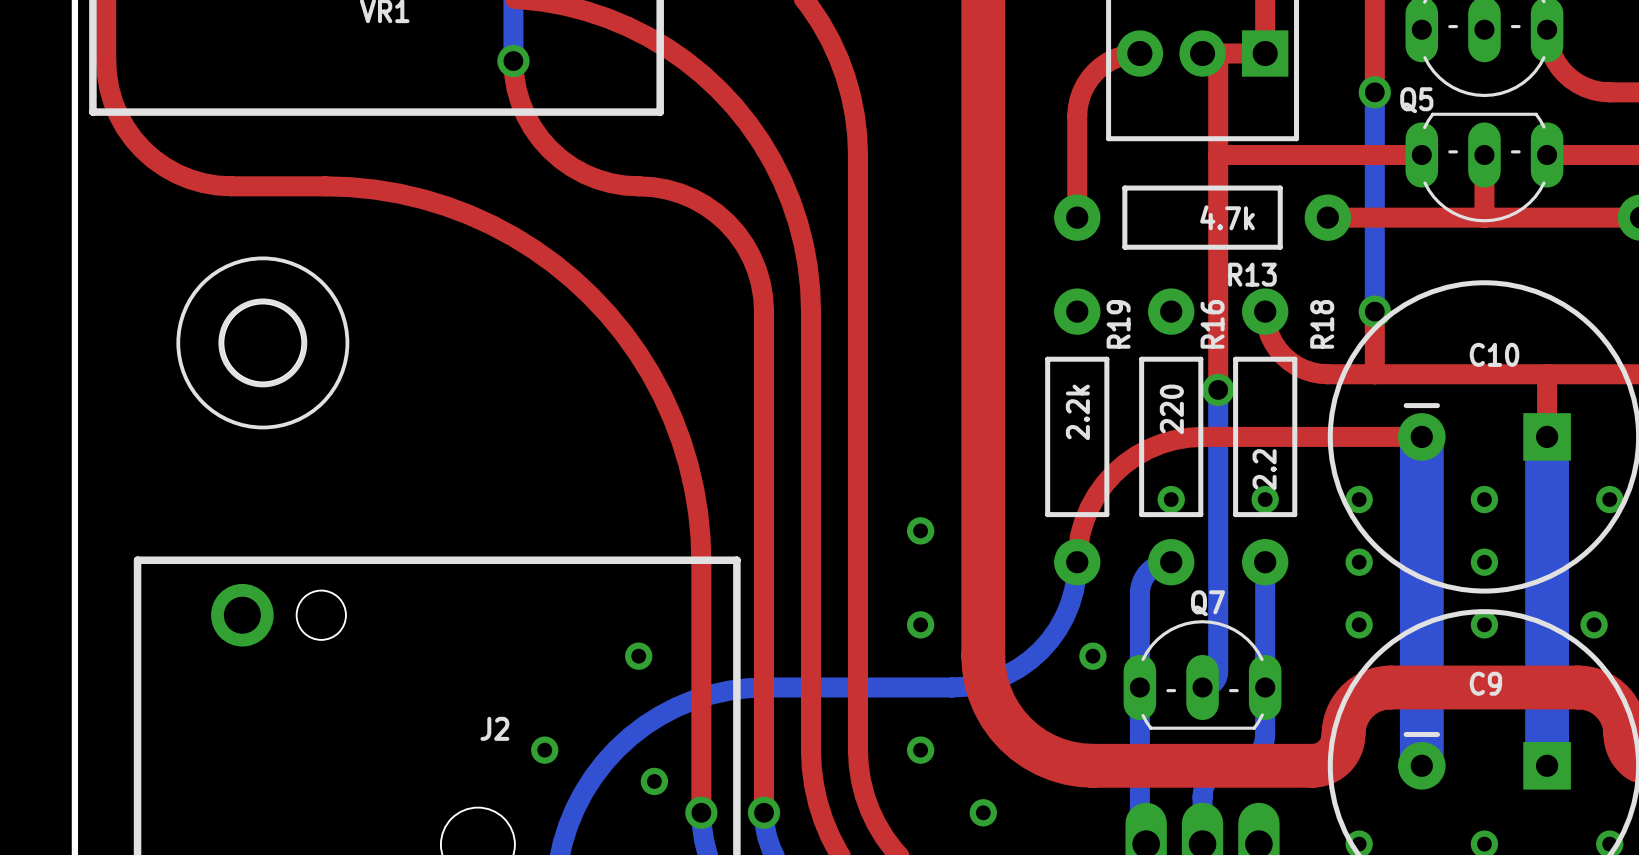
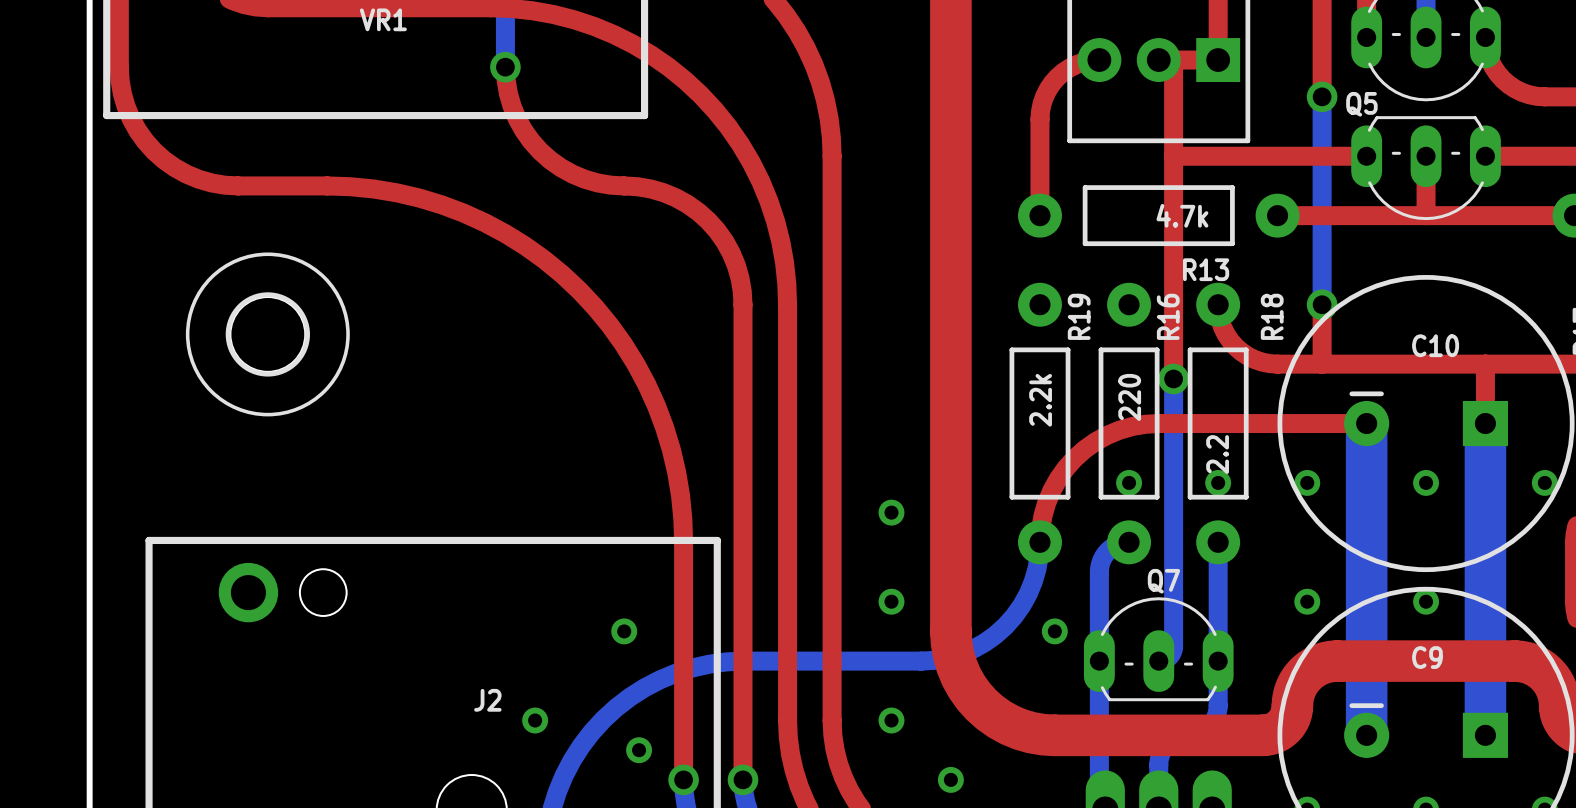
via: (1359, 562) -> none
via: (1484, 562) -> none
via: (1594, 624) -> none

